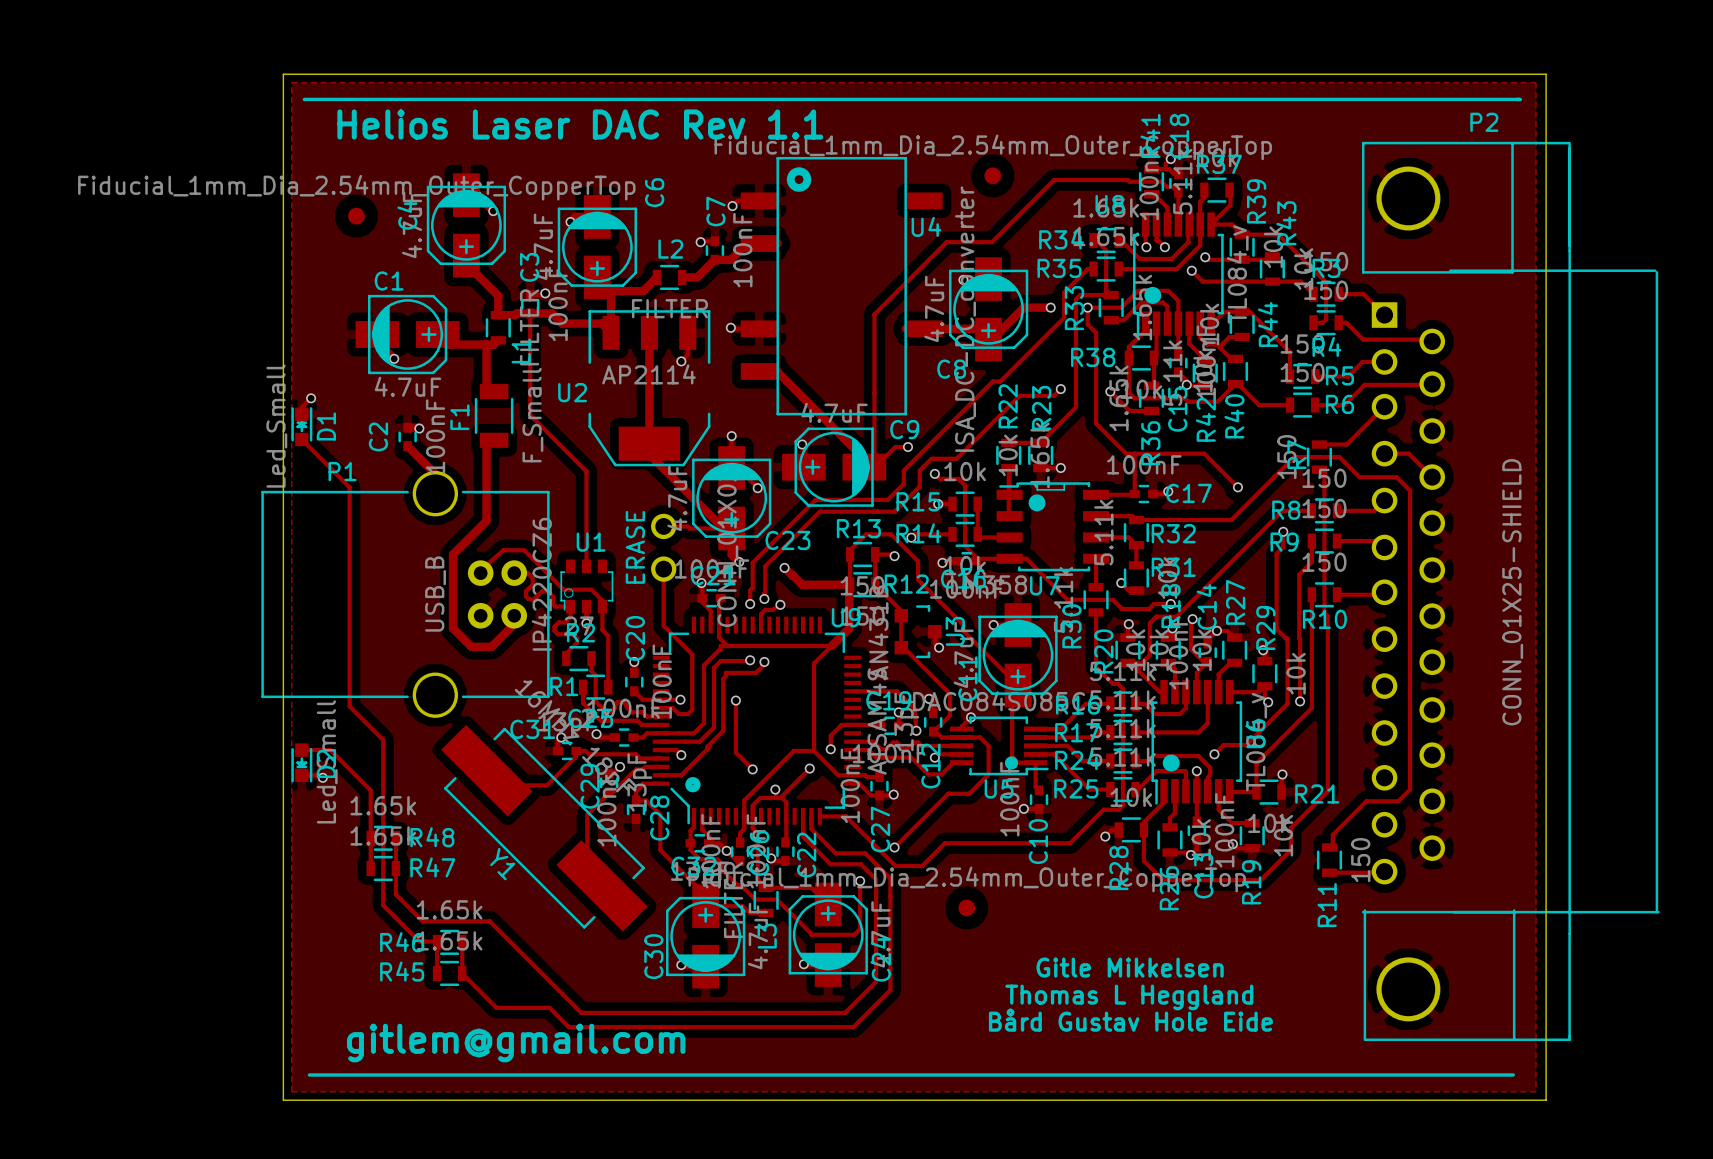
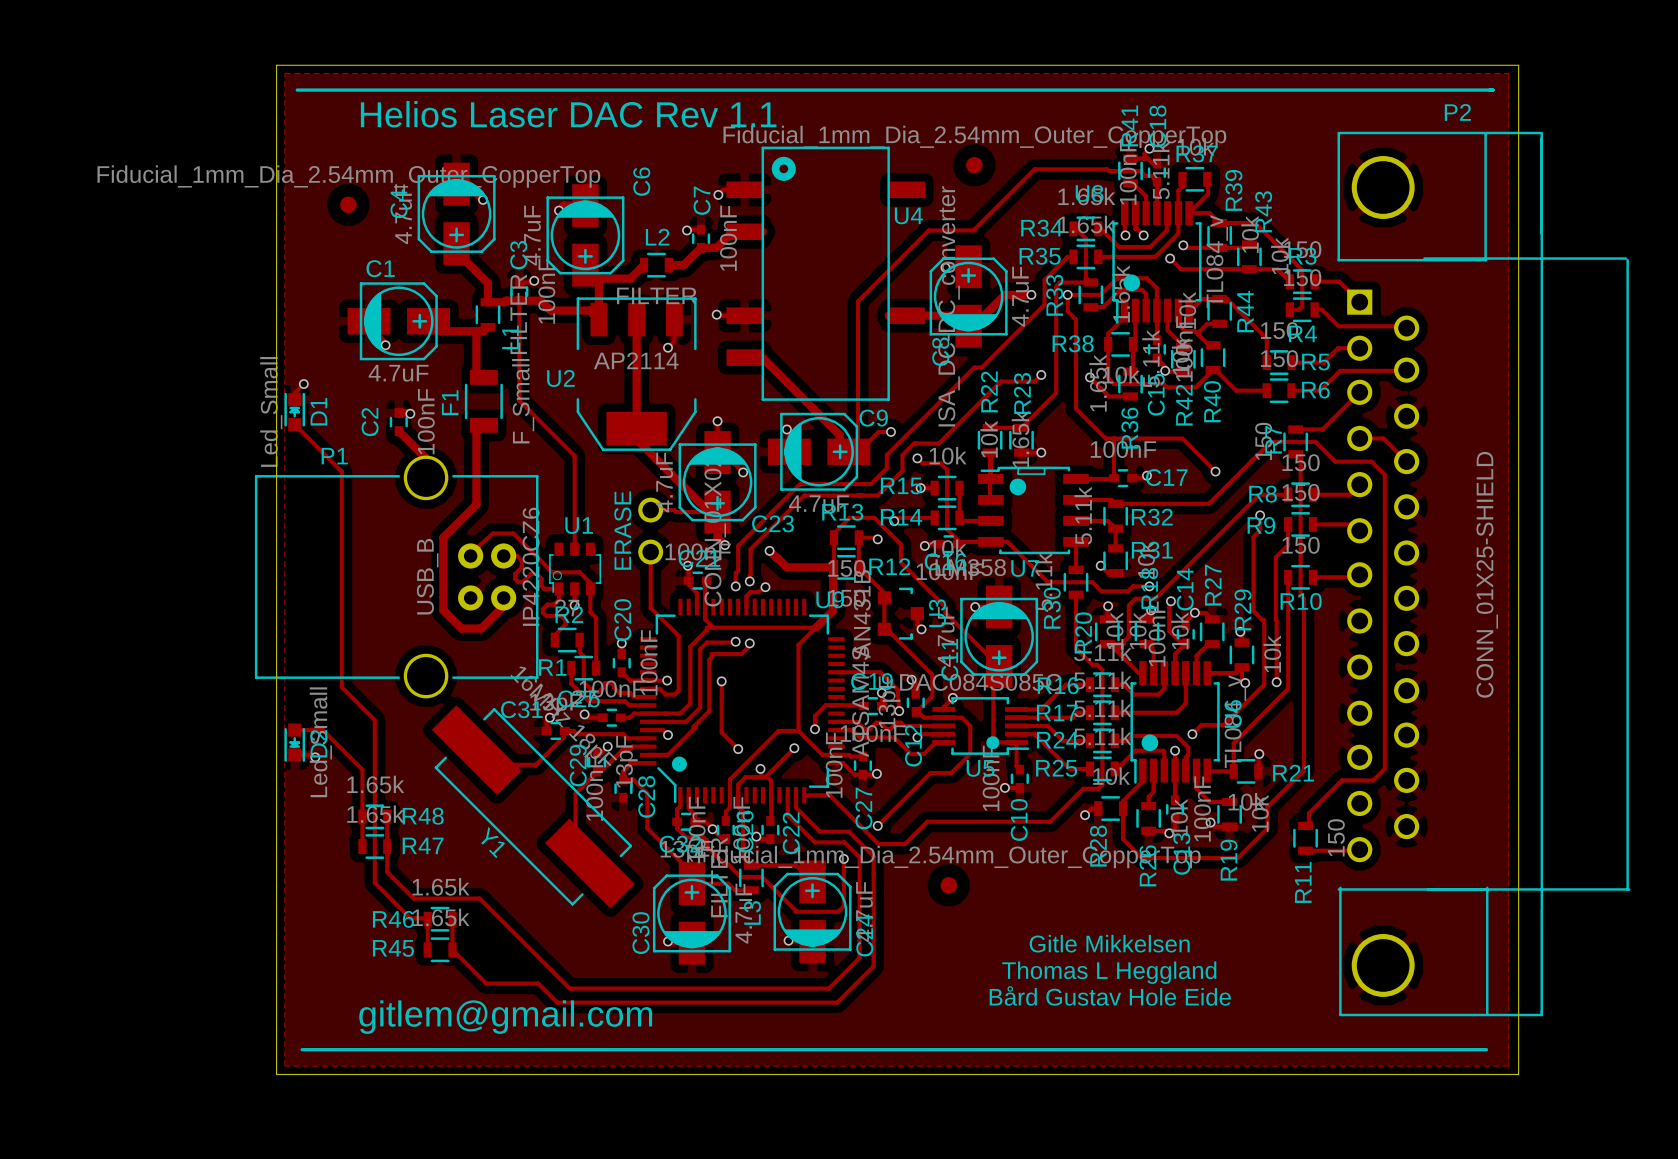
C8 rotation: 0° (988, 309) -> 180° (968, 296)
C9 rotation: 0° (834, 467) -> 180° (819, 451)

